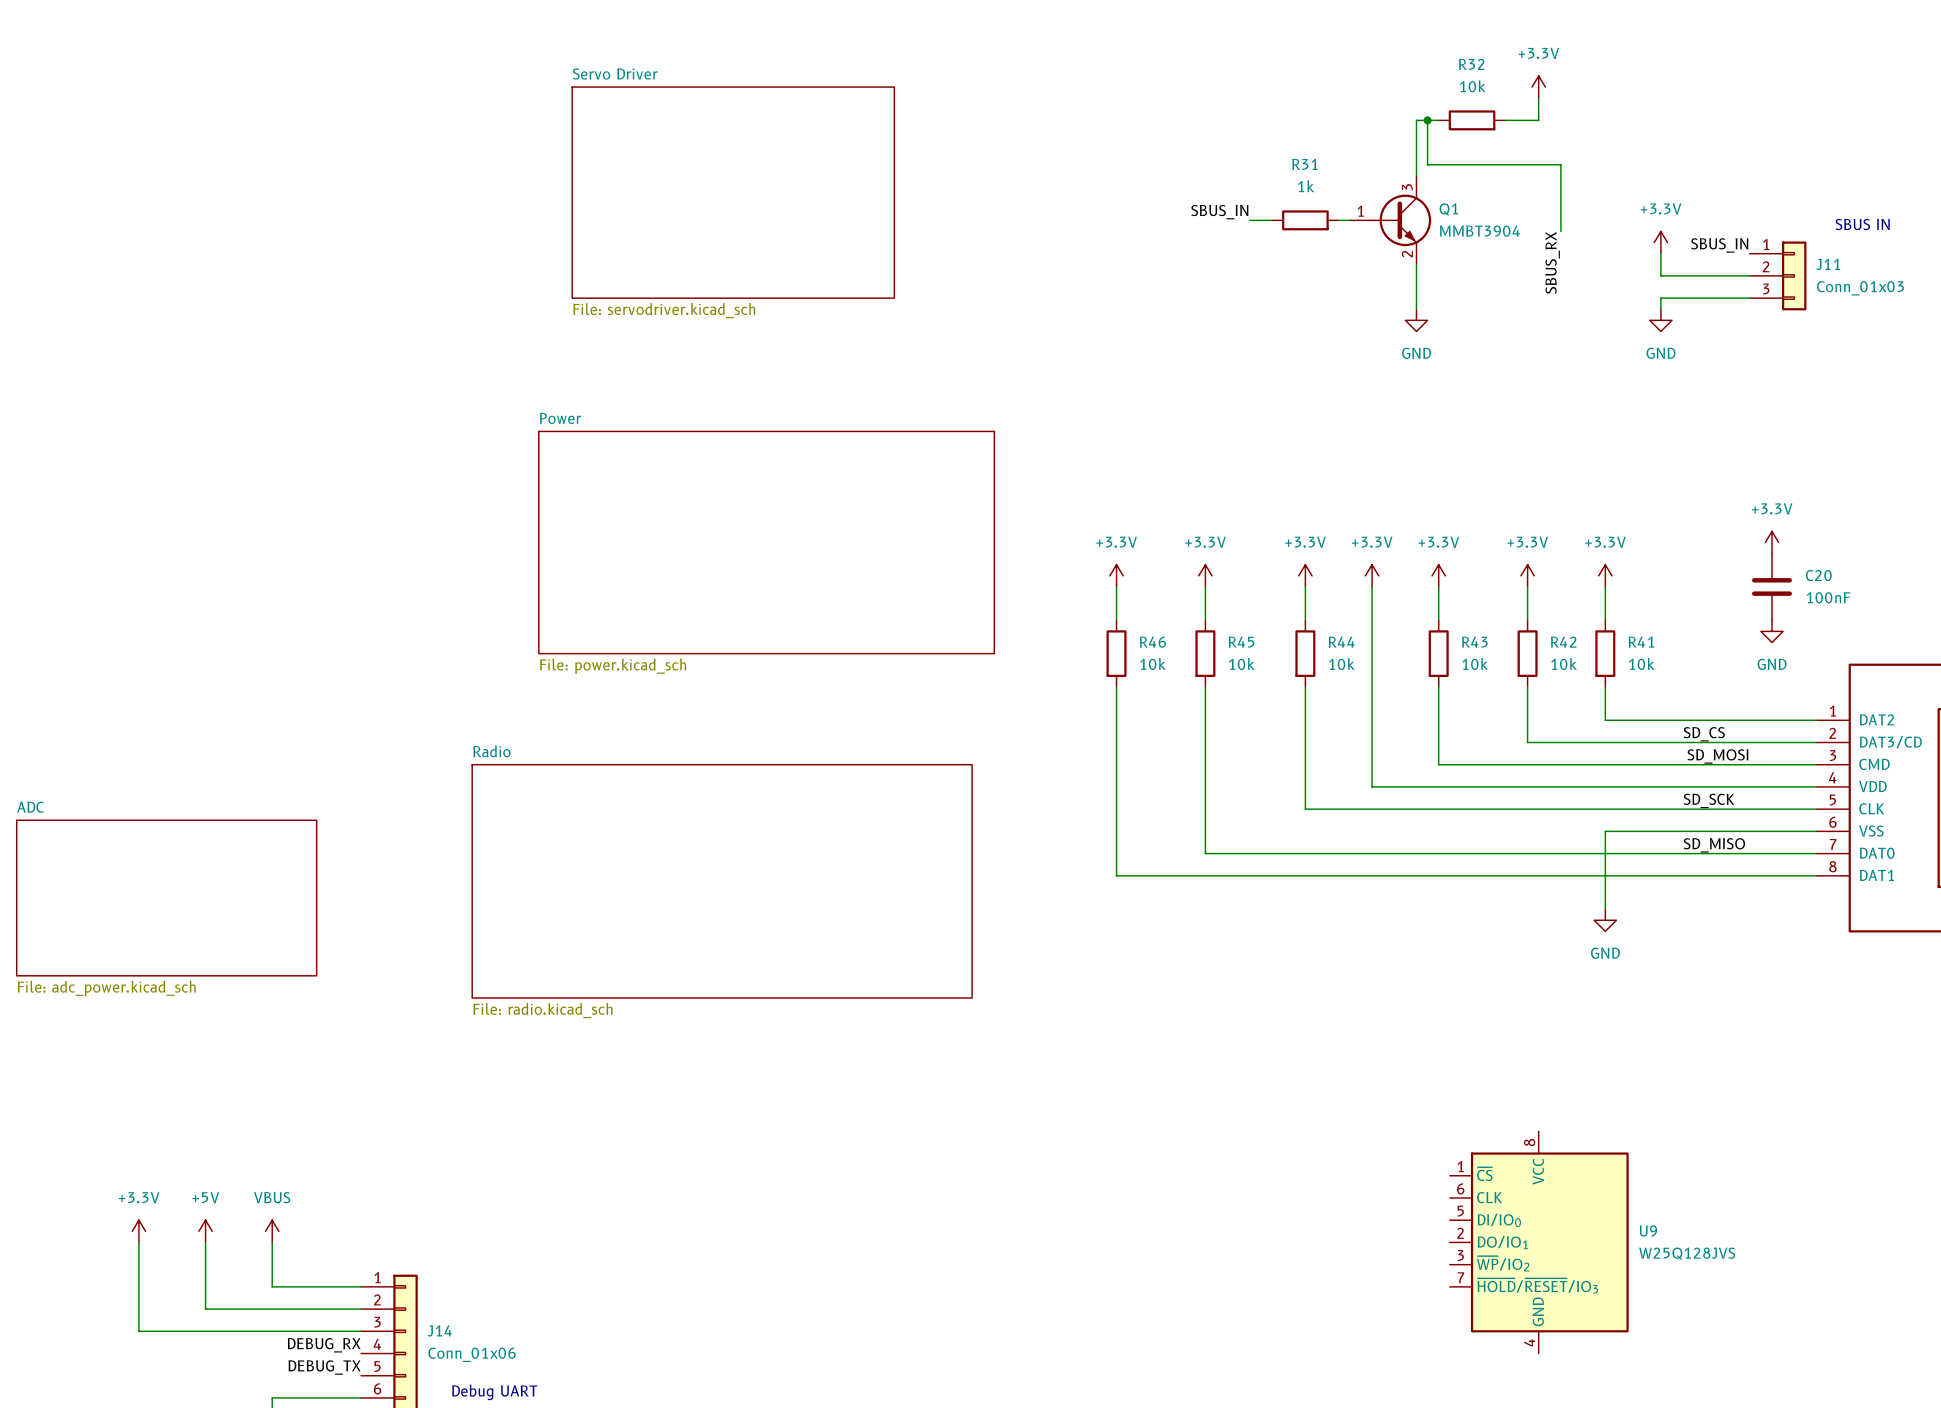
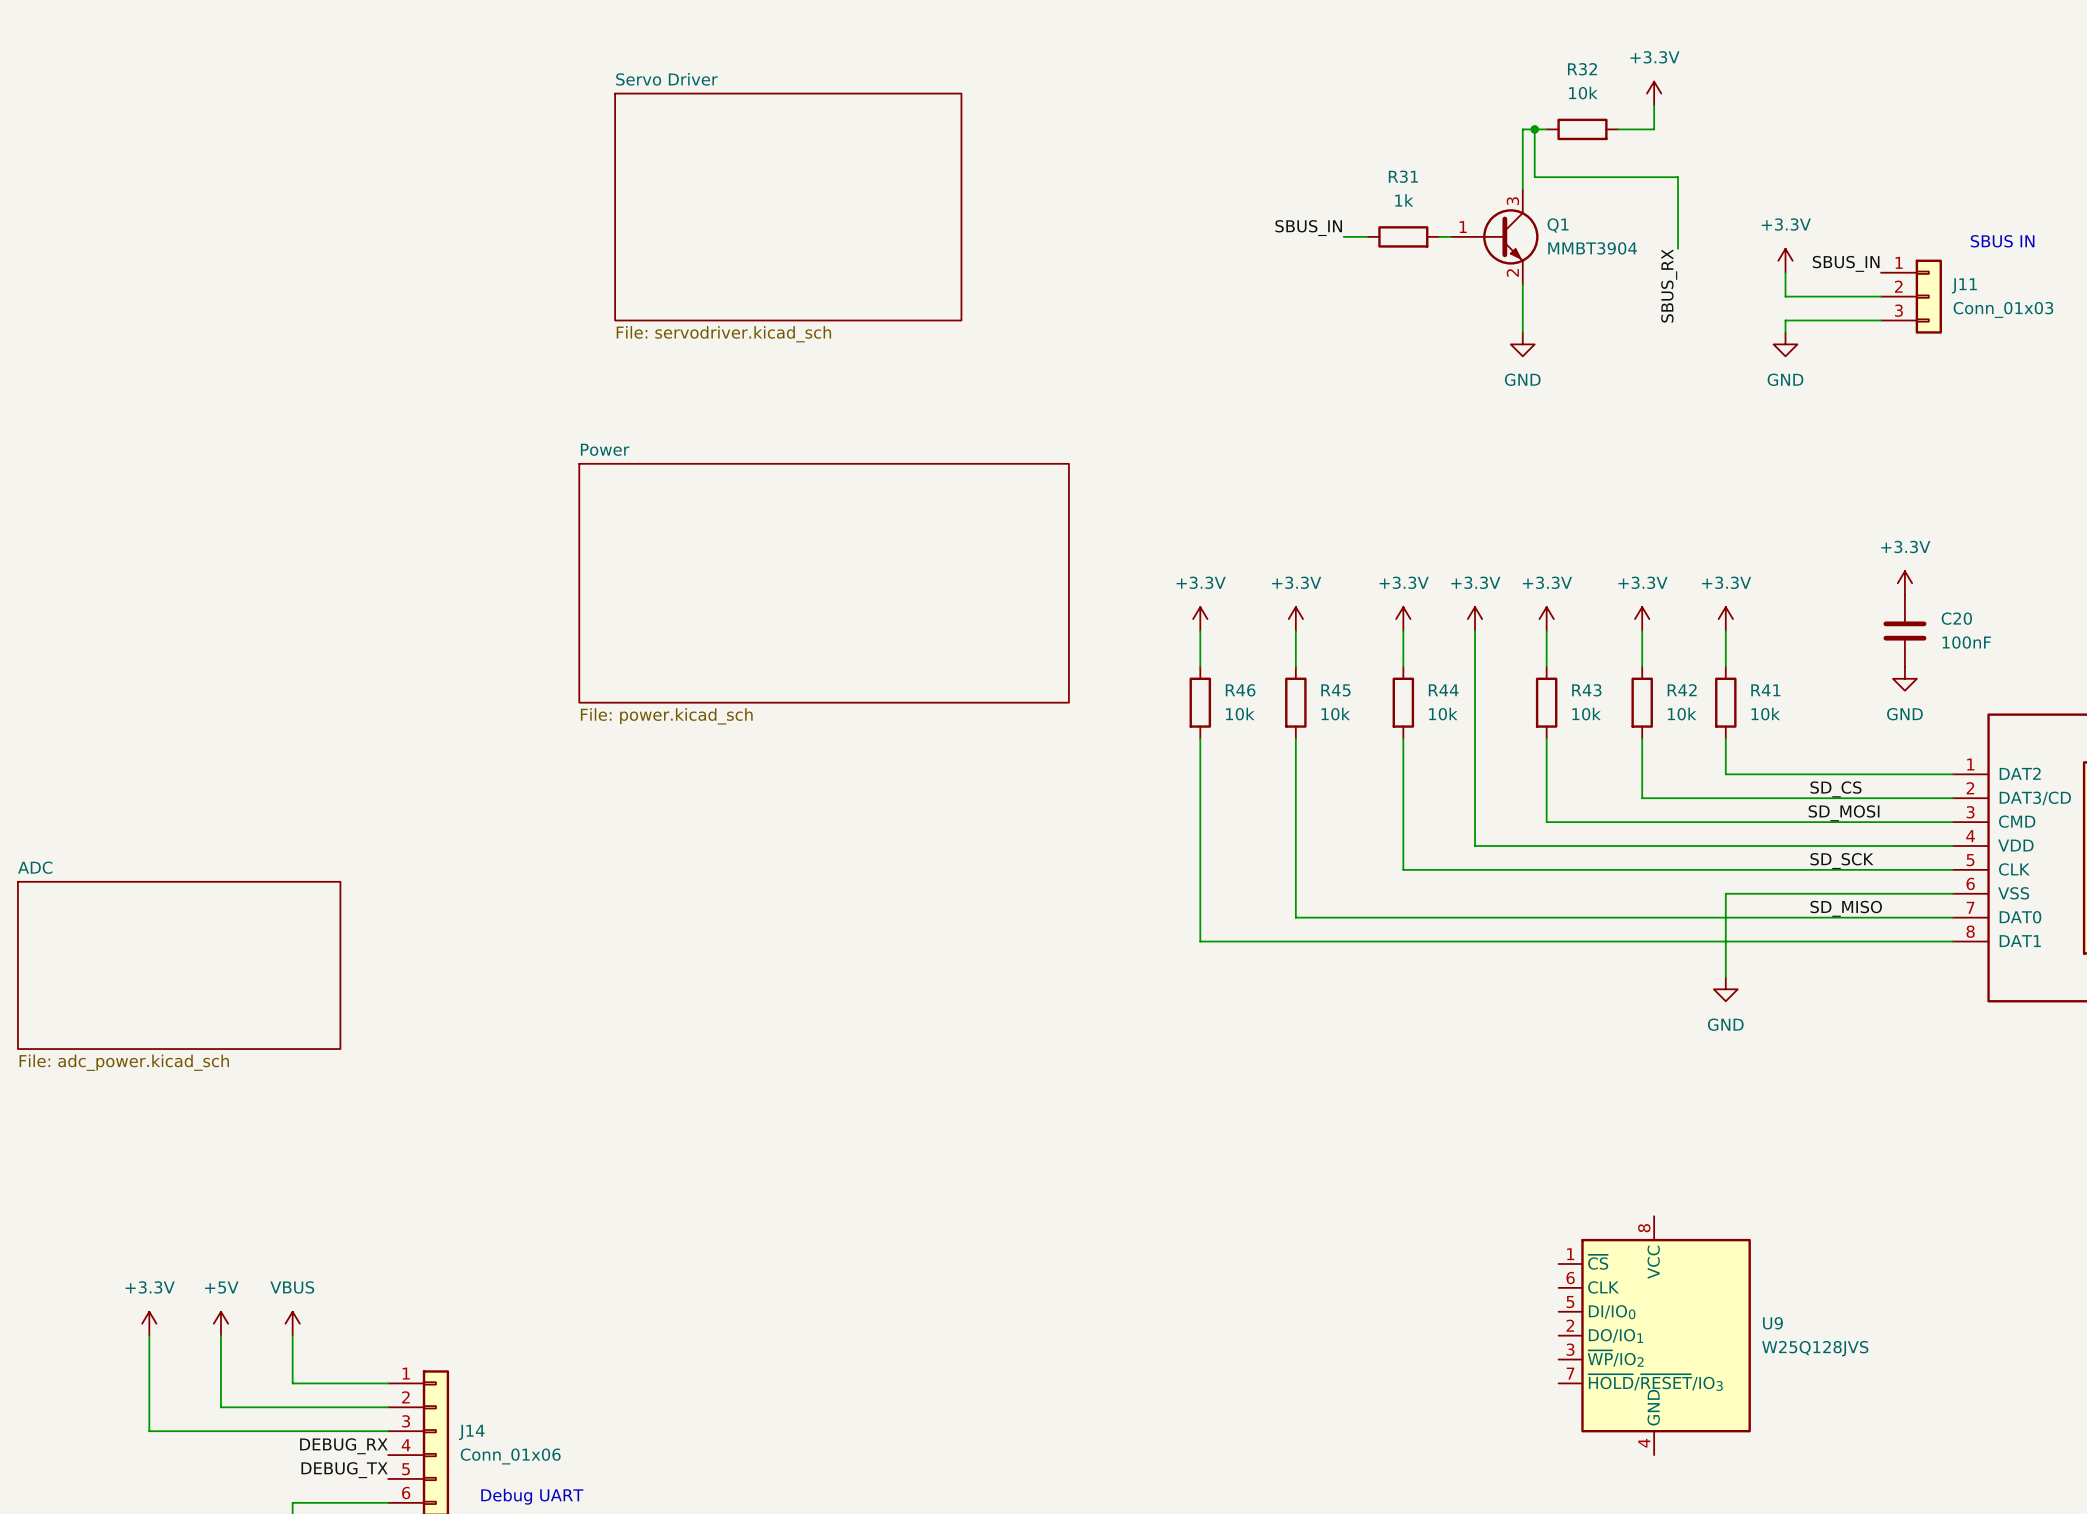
sheet Radio: File: radio.kicad_sch (722, 881) -> none

